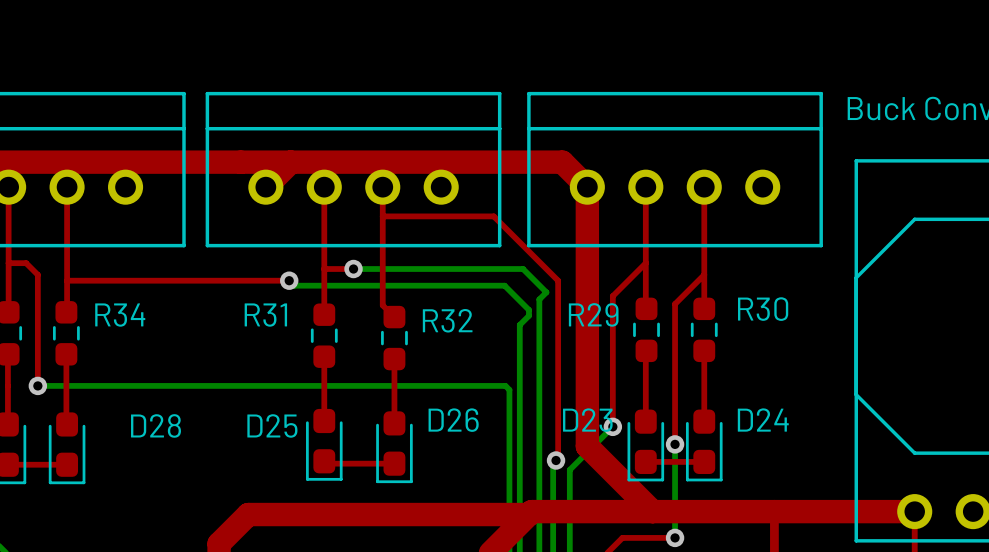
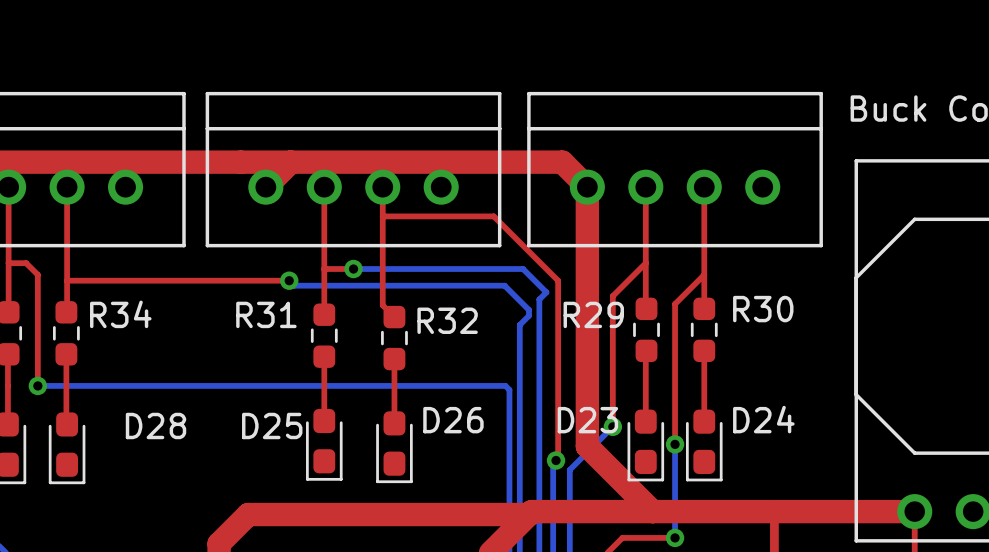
top track: (645, 461) (704, 461) -> none
top track: (326, 463) (394, 463) -> none
top track: (7, 464) (67, 464) -> none

